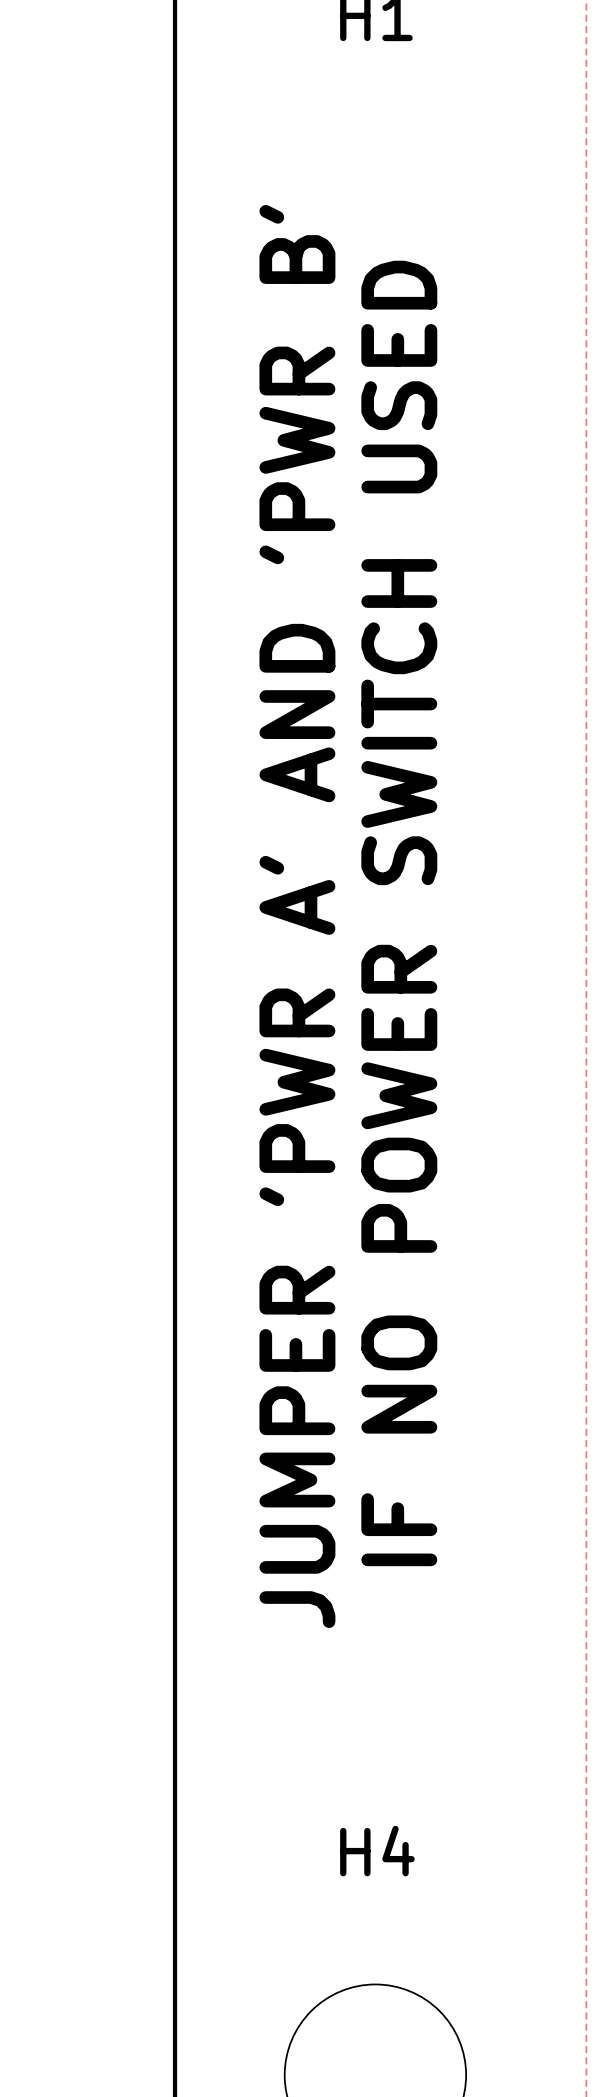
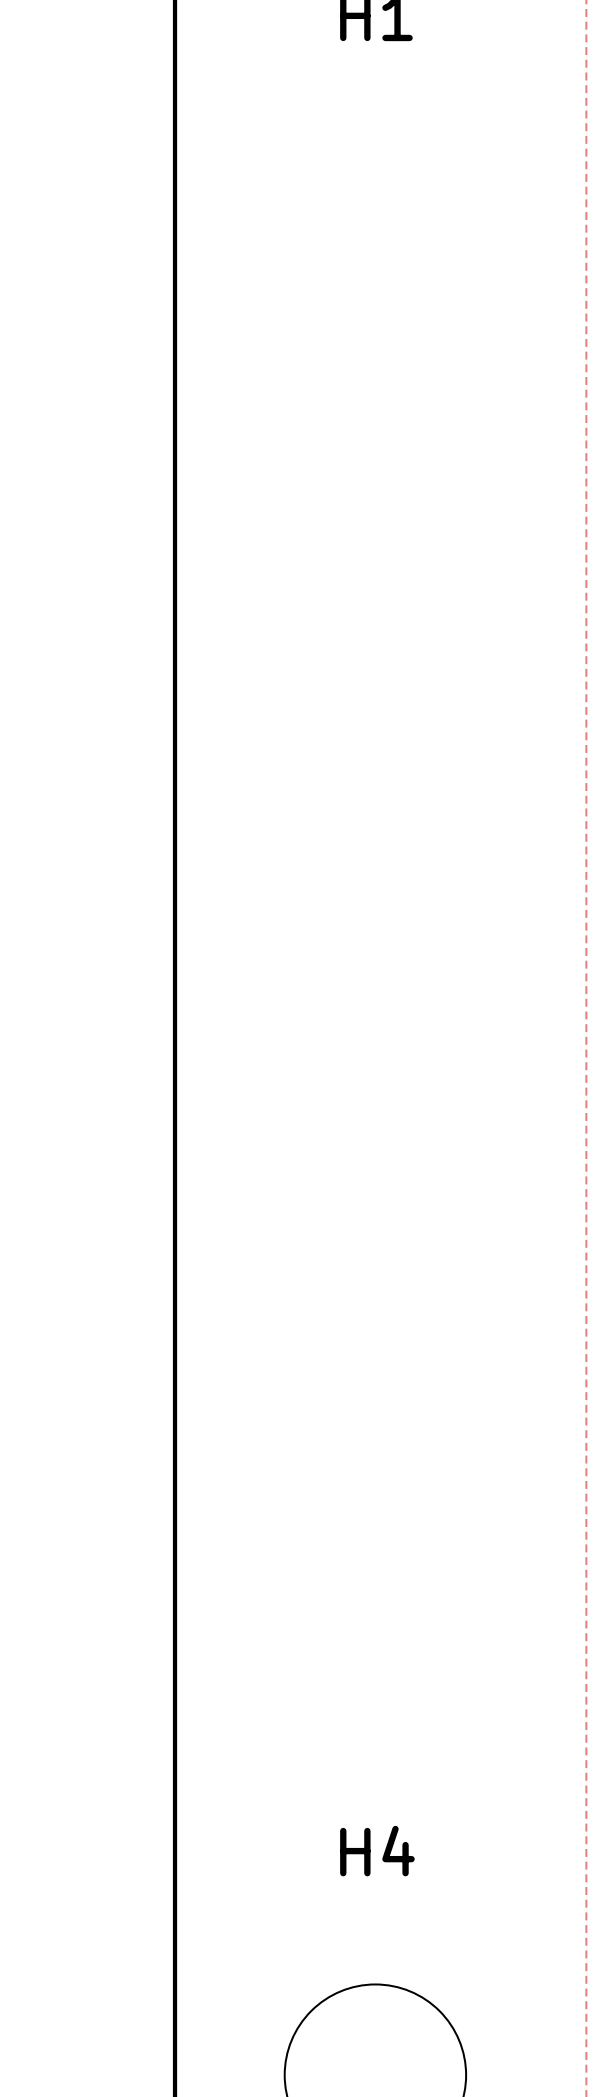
text: IF NO POWER SWITCH USED (399, 913) -> none
text: JUMPER 'PWR A' AND 'PWR B' (297, 916) -> none

